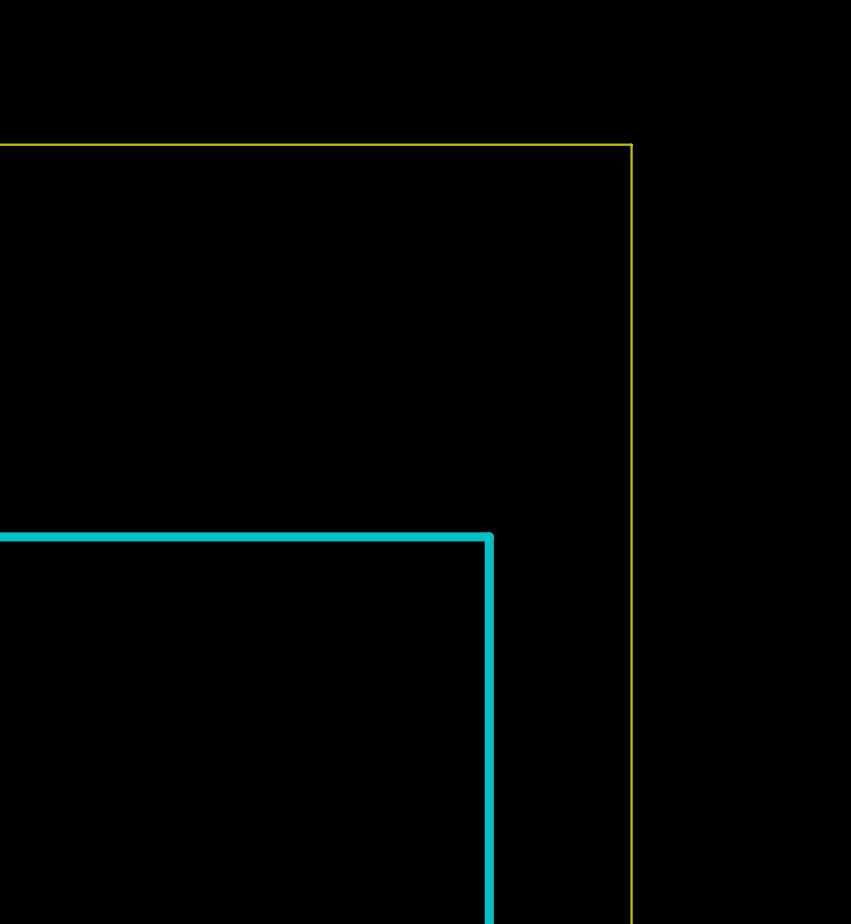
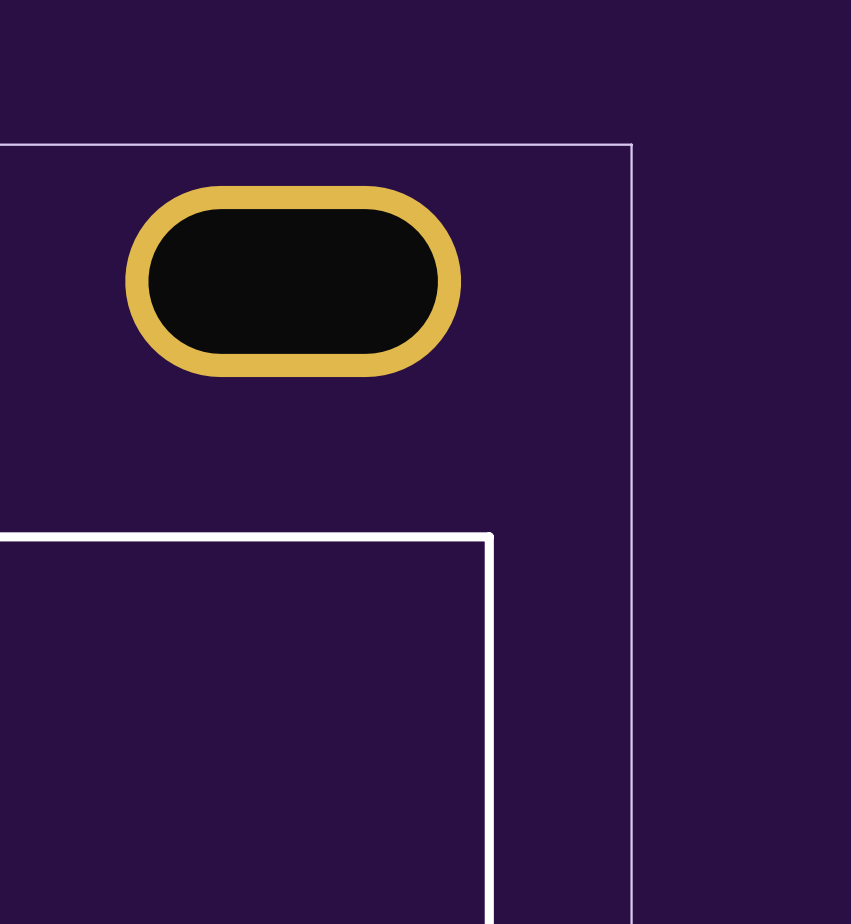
part: none -> (293, 281)

